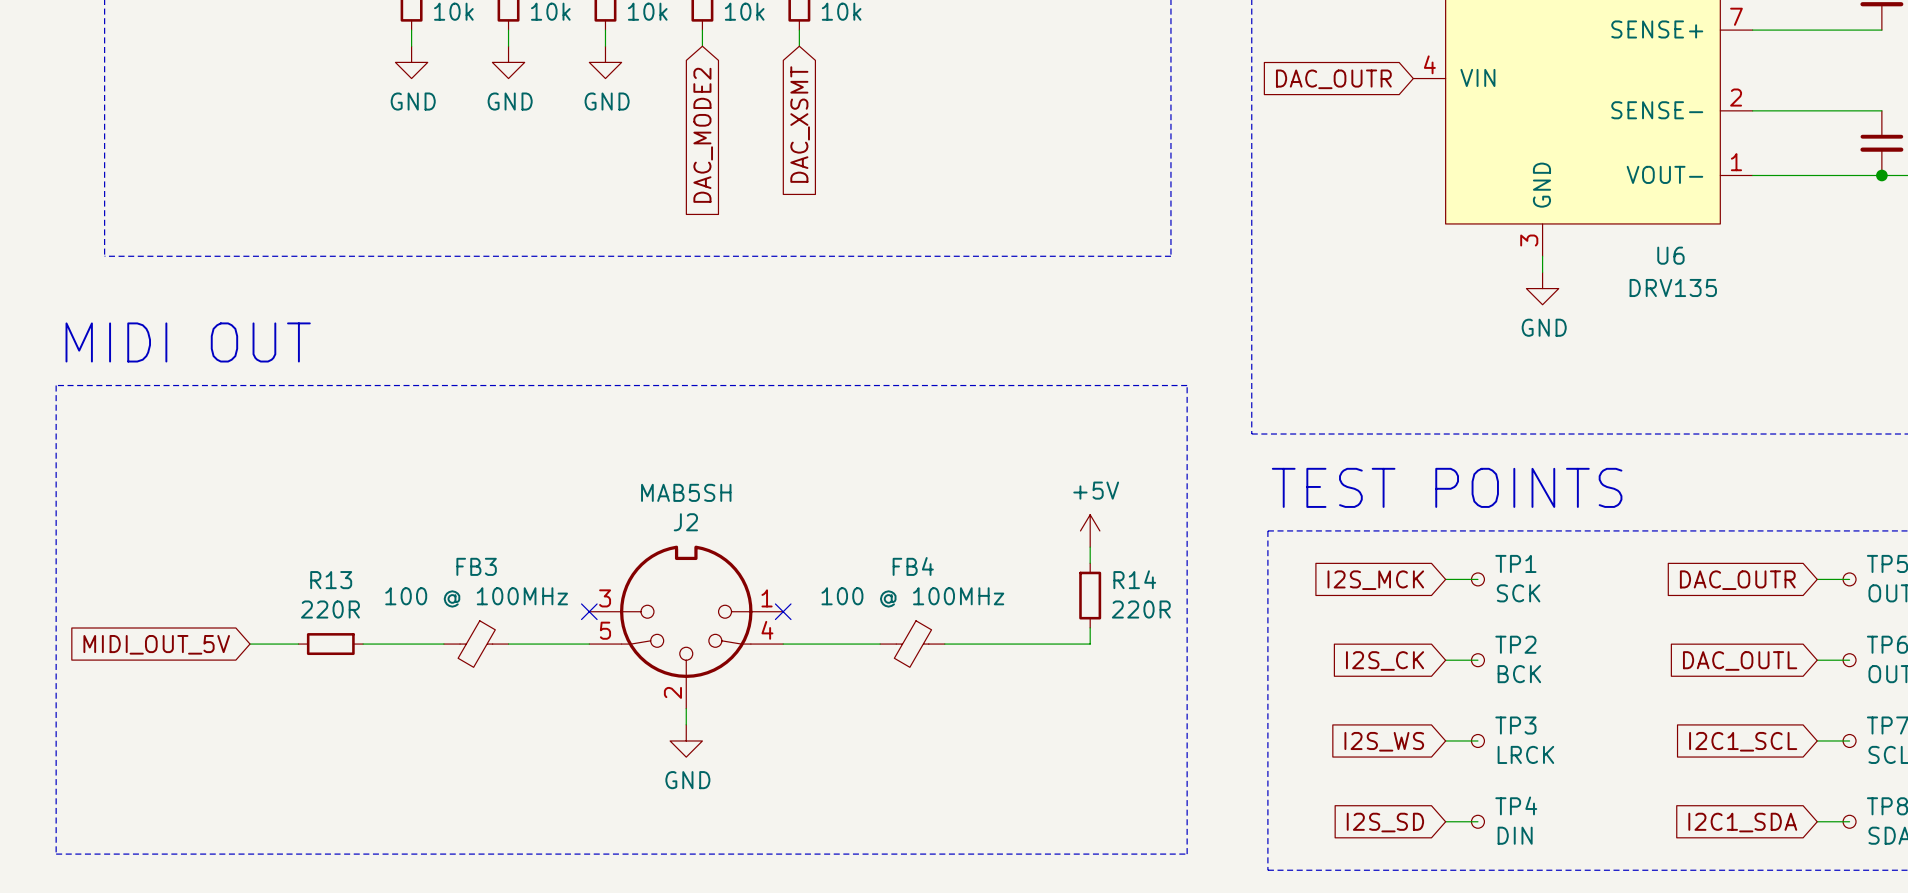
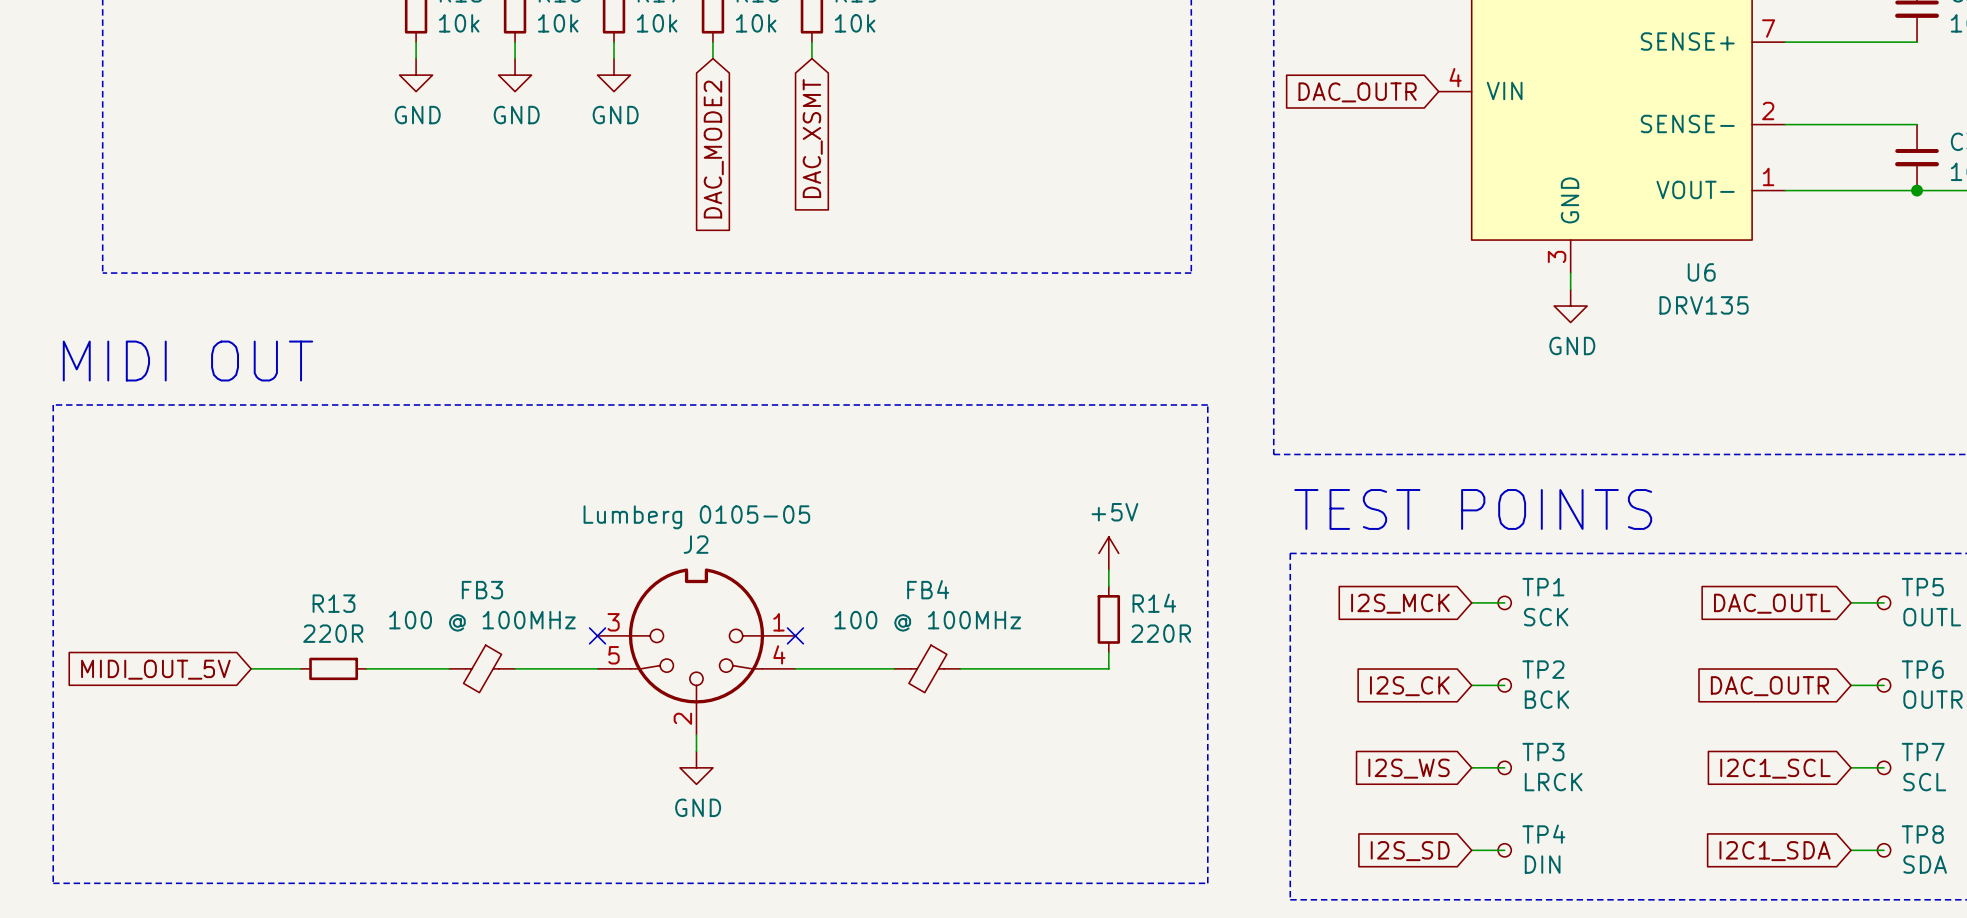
J2 value: MAB5SH (686, 492) -> Lumberg 0105-05 (696, 517)
global label: DAC_OUTR (1737, 580) -> DAC_OUTL (1772, 603)
global label: DAC_OUTL (1740, 660) -> DAC_OUTR (1769, 686)

